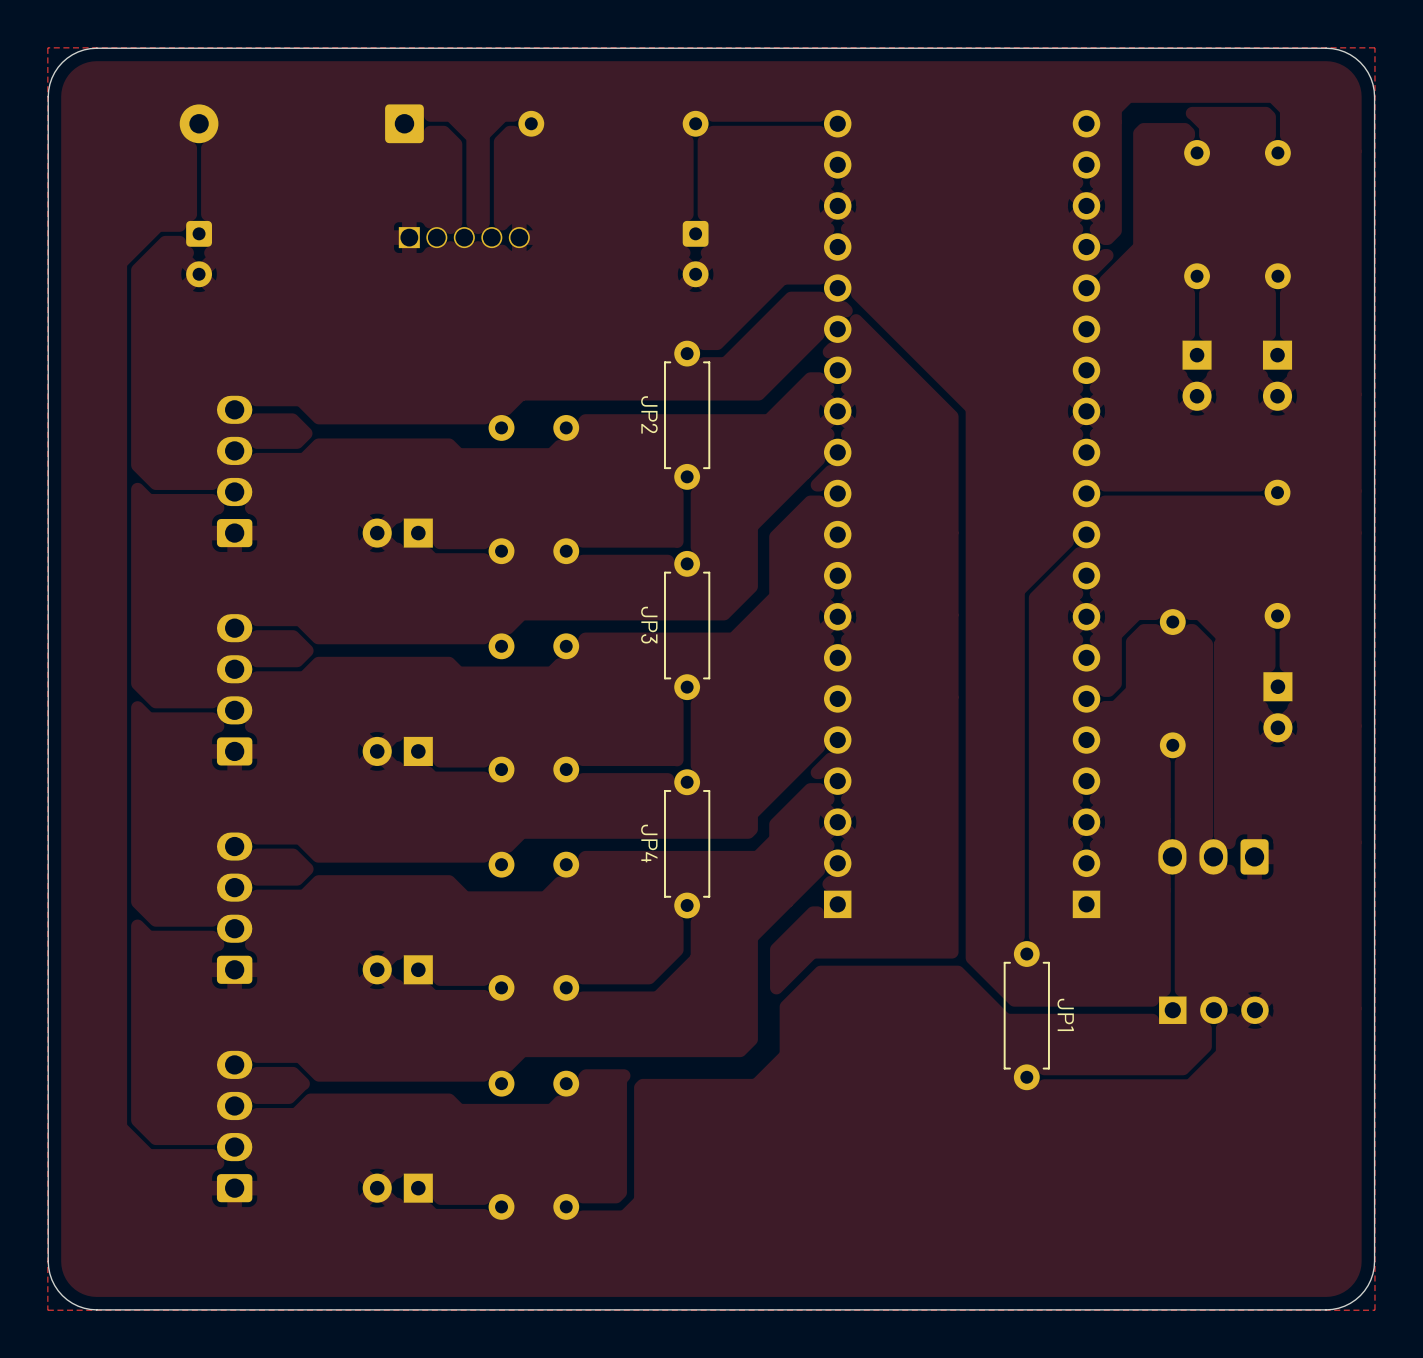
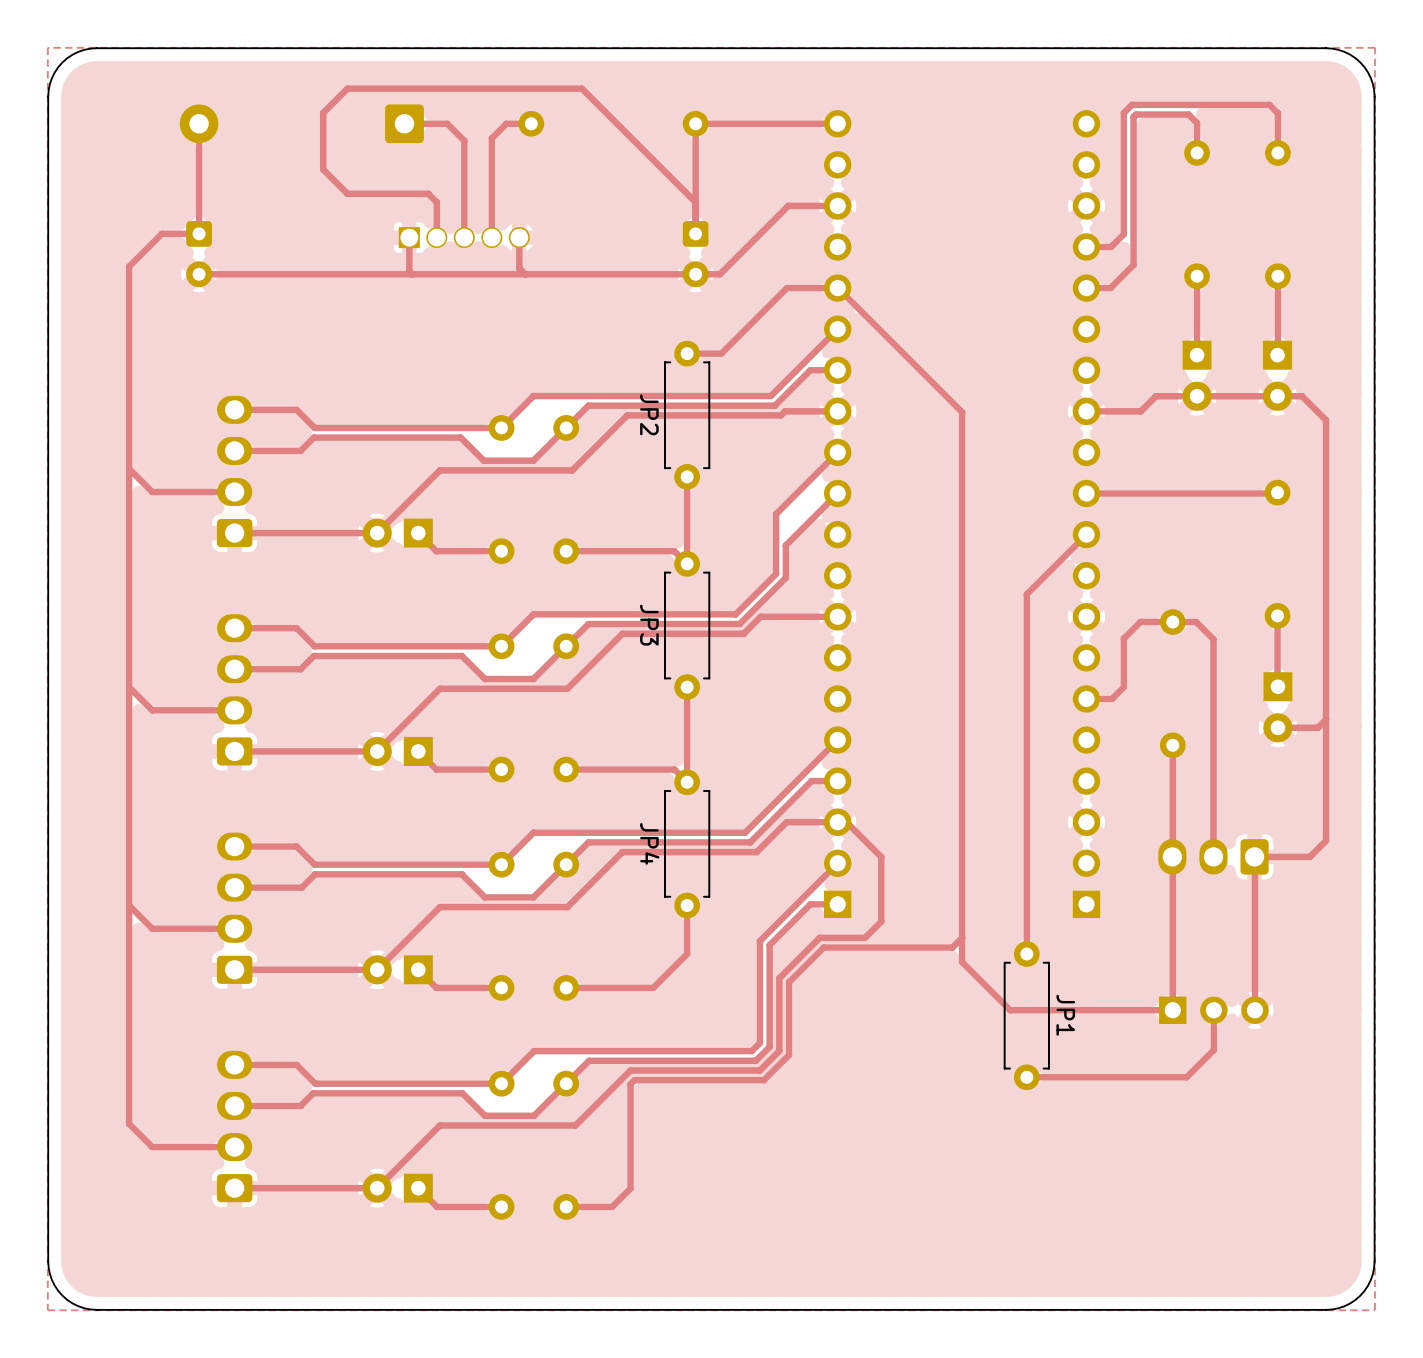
top track: none -> (199, 123) (199, 233) (161, 233) (129, 266) (129, 1123) (152, 1147) (234, 1147)
top track: none -> (404, 123) (447, 123) (464, 140) (464, 237)
top track: none -> (531, 123) (506, 123) (491, 138) (491, 237)
top track: none -> (837, 123) (695, 123) (695, 233)
top track: none -> (1197, 152) (1197, 123) (1188, 114) (1135, 114) (1133, 116) (1133, 264) (1110, 288) (1086, 288)
top track: none -> (1277, 152) (1277, 113) (1269, 104) (1131, 104) (1123, 112) (1123, 234) (1111, 247) (1086, 247)
top track: none -> (695, 202) (582, 88) (347, 88) (323, 112) (323, 169) (347, 193) (428, 193) (436, 202) (436, 237)
top track: none -> (837, 205) (788, 205) (719, 274) (199, 274)
top track: none -> (409, 237) (409, 271) (412, 274)
top track: none -> (519, 237) (519, 268) (525, 274)
top track: none -> (1197, 276) (1197, 355)
top track: none -> (1277, 276) (1277, 354)
top track: none -> (837, 288) (786, 288) (721, 353) (687, 353)
top track: none -> (838, 288) (962, 412) (962, 962) (1010, 1010) (1172, 1010) (1172, 857)
top track: none -> (837, 329) (770, 395) (533, 395) (501, 427) (314, 427) (296, 409) (234, 409)
top track: none -> (837, 370) (810, 370) (774, 405) (588, 405) (533, 460) (483, 460) (460, 437) (313, 437) (300, 450) (234, 450)
top track: none -> (837, 411) (785, 411) (780, 415) (627, 415) (572, 470) (439, 470) (377, 533) (234, 533)
top track: none -> (1086, 411) (1140, 411) (1155, 396) (1302, 396) (1326, 420) (1326, 840) (1309, 856) (1254, 856)
top track: none -> (837, 452) (776, 514) (776, 573) (735, 614) (533, 614) (501, 646) (314, 646) (296, 628) (234, 628)
top track: none -> (129, 468) (152, 491) (234, 491)
top track: none -> (687, 476) (687, 563) (674, 551) (566, 551)
top track: none -> (837, 493) (785, 545) (785, 577) (739, 624) (588, 624) (533, 679) (484, 679) (461, 656) (313, 656) (300, 669) (234, 669)
top track: none -> (1276, 493) (1086, 493)
top track: none -> (418, 533) (436, 551) (501, 551)
top track: none -> (1086, 534) (1026, 594) (1026, 954)
top track: none -> (1277, 615) (1277, 686)
top track: none -> (837, 616) (760, 616) (743, 633) (622, 633) (567, 688) (439, 688) (377, 751) (234, 751)
top track: none -> (129, 687) (152, 710) (234, 710)
top track: none -> (687, 687) (687, 782) (674, 769) (566, 769)
top track: none -> (1086, 698) (1112, 698) (1123, 687) (1123, 638) (1140, 622) (1196, 622) (1213, 639) (1213, 856)
top track: none -> (1326, 719) (1317, 727) (1277, 727)
top track: none -> (837, 740) (745, 832) (533, 832) (501, 864) (314, 864) (296, 846) (234, 846)
top track: none -> (1172, 745) (1172, 856)
top track: none -> (418, 751) (436, 769) (501, 769)
top track: none -> (837, 781) (811, 781) (750, 842) (588, 842) (533, 897) (484, 897) (461, 874) (315, 874) (301, 887) (234, 887)
top track: none -> (837, 822) (786, 822) (756, 852) (622, 852) (567, 907) (439, 907) (377, 969) (234, 969)
top track: none -> (846, 822) (881, 856) (881, 921) (865, 937) (819, 937) (779, 978) (779, 1051) (759, 1070) (630, 1070) (575, 1125) (439, 1125) (377, 1188) (234, 1188)
top track: none -> (1254, 857) (1254, 1010)
top track: none -> (837, 863) (759, 941) (759, 1042) (751, 1051) (534, 1051) (501, 1083) (315, 1083) (296, 1064) (234, 1064)
top track: none -> (837, 904) (810, 904) (769, 945) (769, 1047) (755, 1060) (589, 1060) (534, 1115) (484, 1115) (462, 1093) (313, 1093) (300, 1105) (234, 1105)
top track: none -> (129, 905) (152, 928) (234, 928)
top track: none -> (687, 905) (687, 954) (653, 987) (566, 987)
top track: none -> (962, 937) (952, 947) (823, 947) (789, 982) (789, 1055) (763, 1080) (634, 1080) (630, 1084) (630, 1188) (612, 1206) (566, 1206)
top track: none -> (418, 969) (436, 987) (501, 987)
top track: none -> (1213, 1010) (1213, 1050) (1186, 1077) (1026, 1077)
top track: none -> (418, 1188) (437, 1206) (501, 1206)

